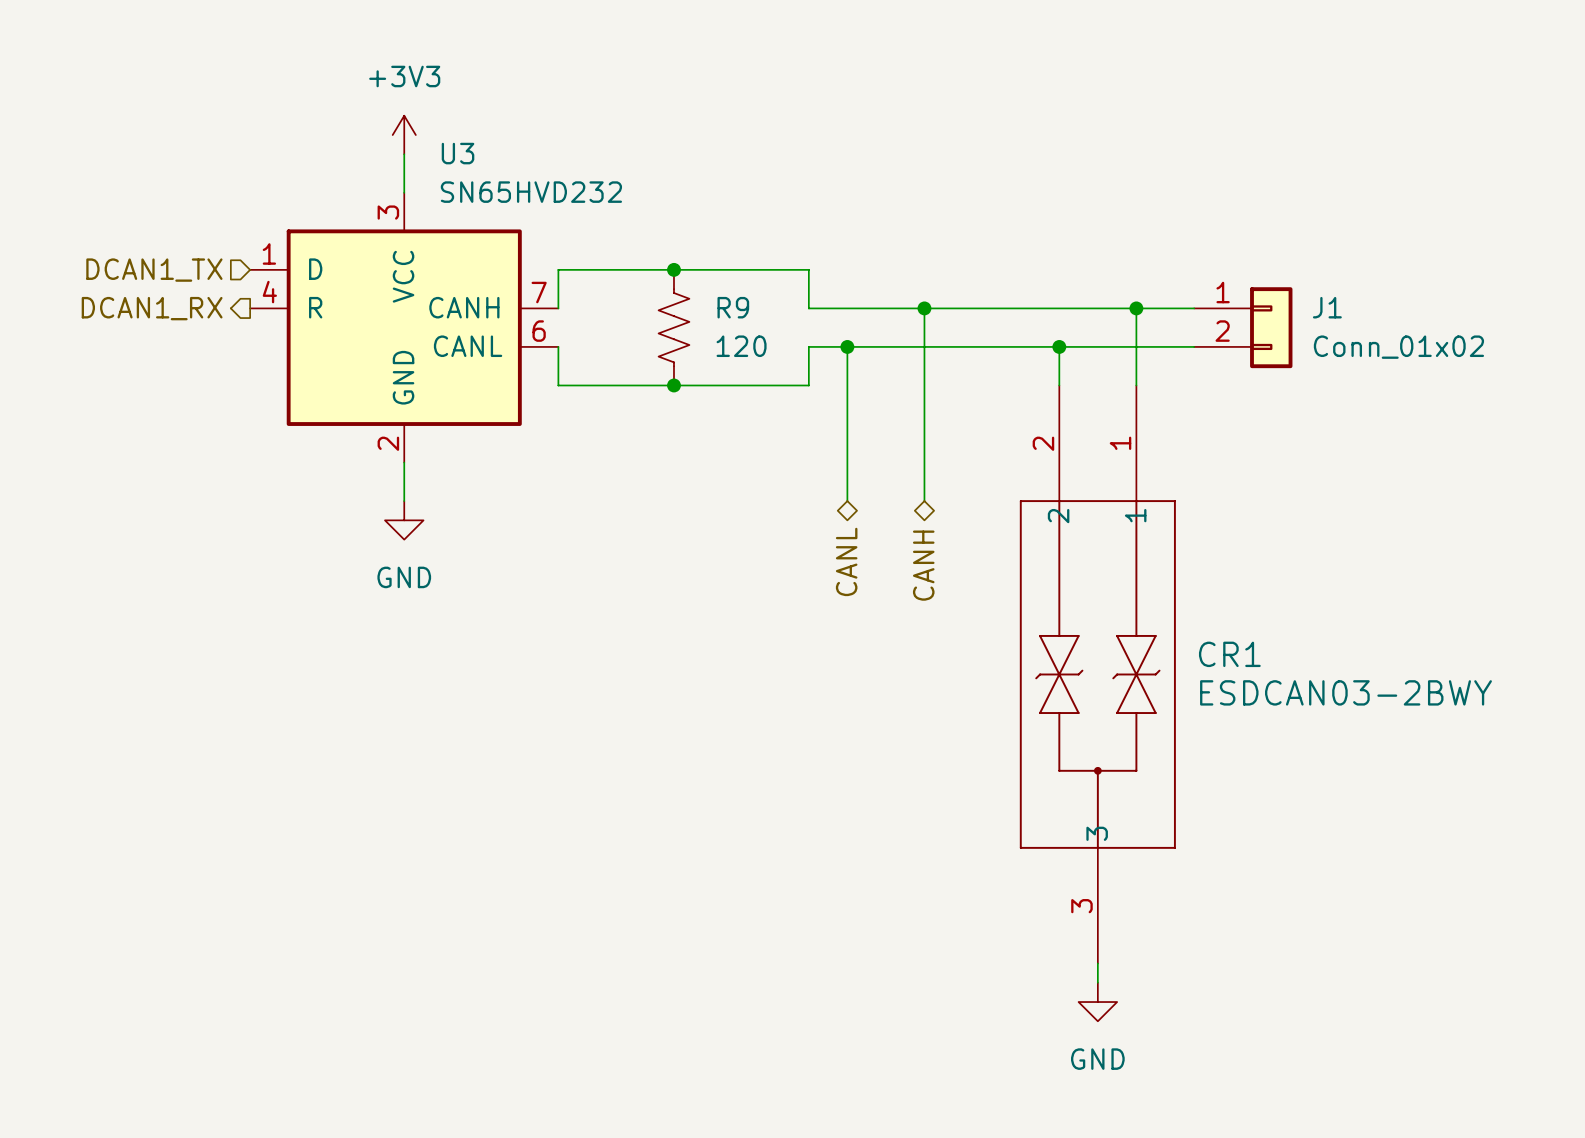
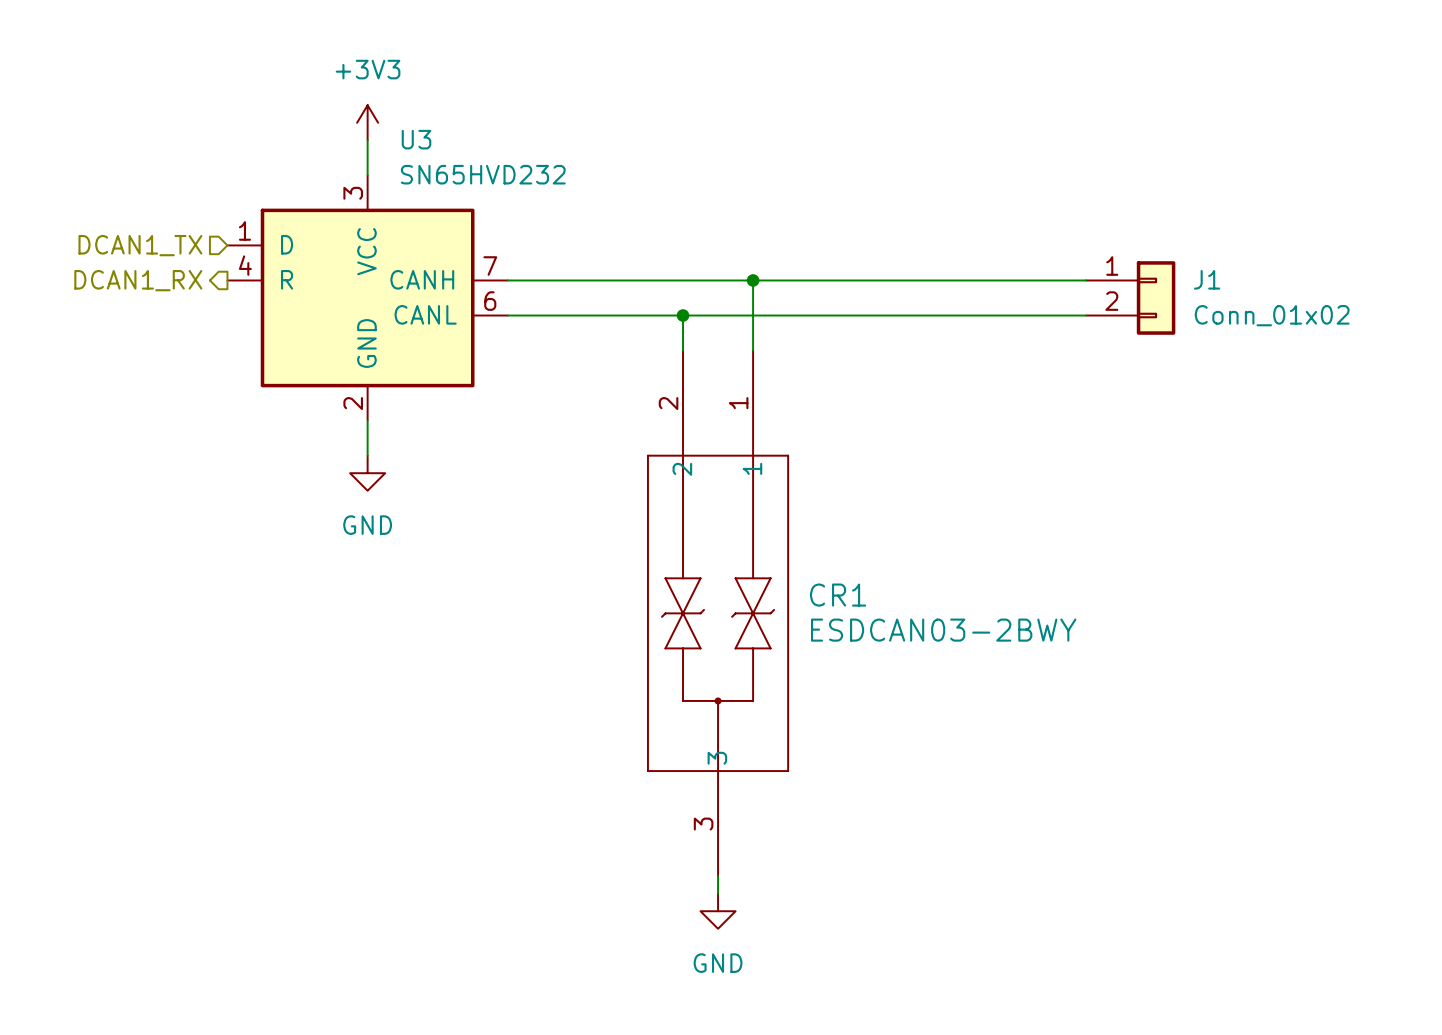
junction: (673, 269) -> none
wire: (558, 308) (558, 269) (808, 269) (808, 308) -> (507, 280) (735, 280)
wire: (924, 308) (924, 501) -> none
junction: (924, 308) -> none
wire: (1136, 308) (1136, 385) -> (753, 280) (753, 350)
junction: (1136, 308) -> none
R9: 120 (673, 327) -> none
wire: (558, 346) (558, 385) (808, 385) (808, 346) -> (507, 315) (735, 315)
junction: none -> (683, 315)
wire: (847, 346) (847, 501) -> none
junction position: (847, 346) -> (753, 280)
wire: (1059, 346) (1059, 385) -> (683, 315) (683, 350)
junction: (1059, 346) -> none
junction: (673, 385) -> none
hierarchical label: CANL (846, 561) -> none
hierarchical label: CANH (923, 565) -> none
CR1 position: (1097, 674) -> (718, 613)
wire: (1097, 963) (1097, 982) -> (718, 876) (718, 893)
power symbol position: GND (1097, 1002) -> GND (718, 911)

